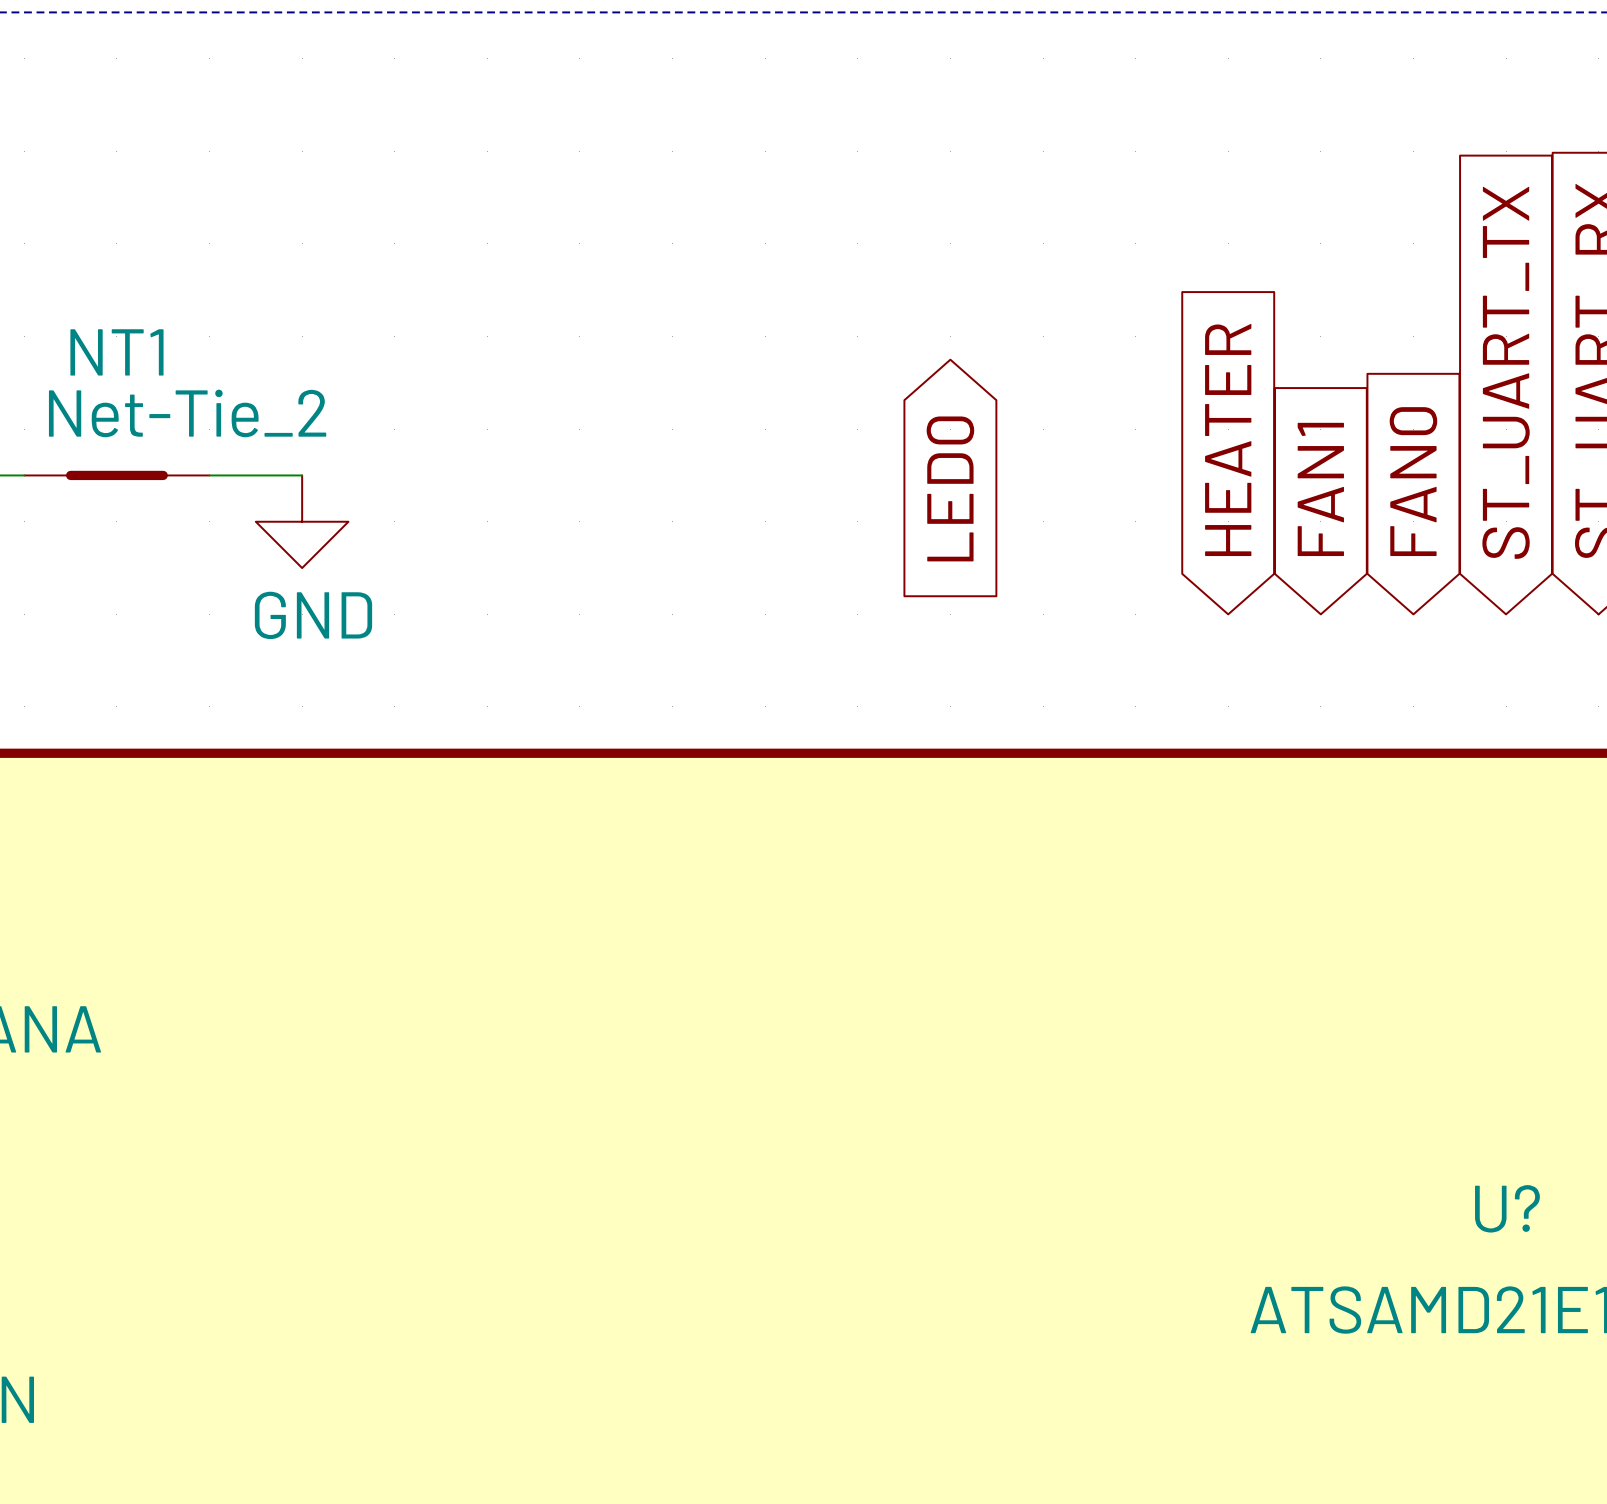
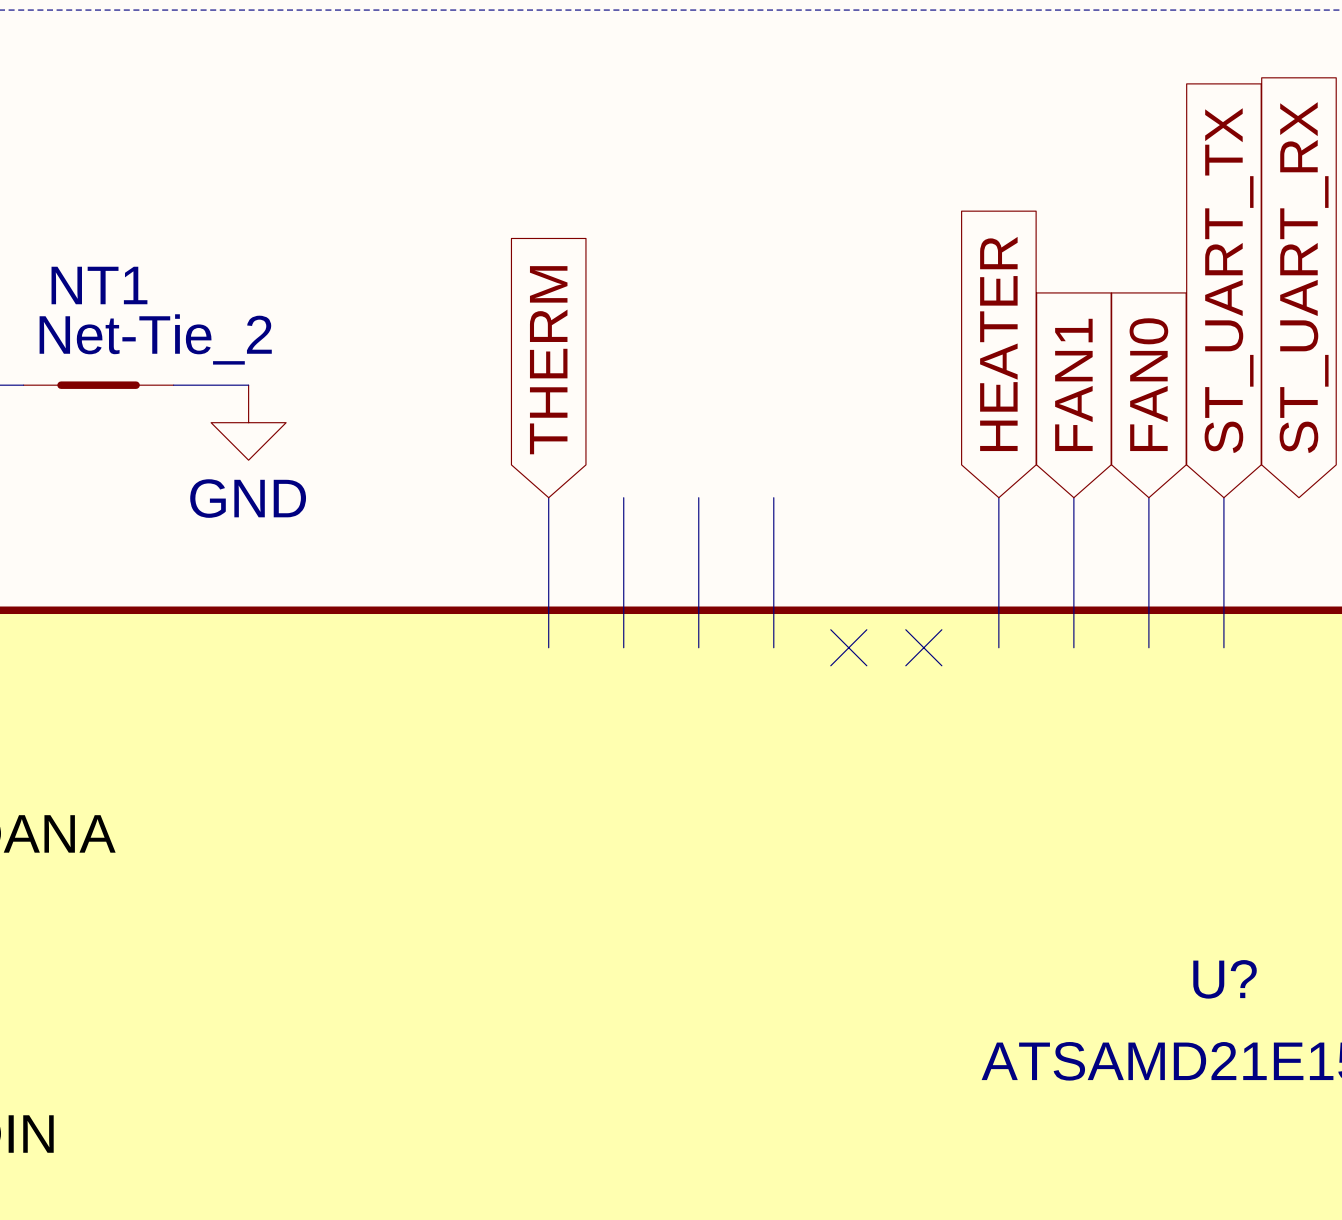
global label: none -> THERM (548, 360)
global label: LED0 (950, 488) -> none
wire: none -> (548, 497) (548, 647)
wire: none -> (623, 497) (623, 647)
wire: none -> (698, 497) (698, 647)
wire: none -> (773, 497) (773, 647)
wire: none -> (998, 497) (998, 647)
wire: none -> (1073, 497) (1073, 647)
wire: none -> (1148, 497) (1148, 647)
wire: none -> (1223, 497) (1223, 647)
no-connect mark: none -> (848, 647)
no-connect mark: none -> (923, 647)

